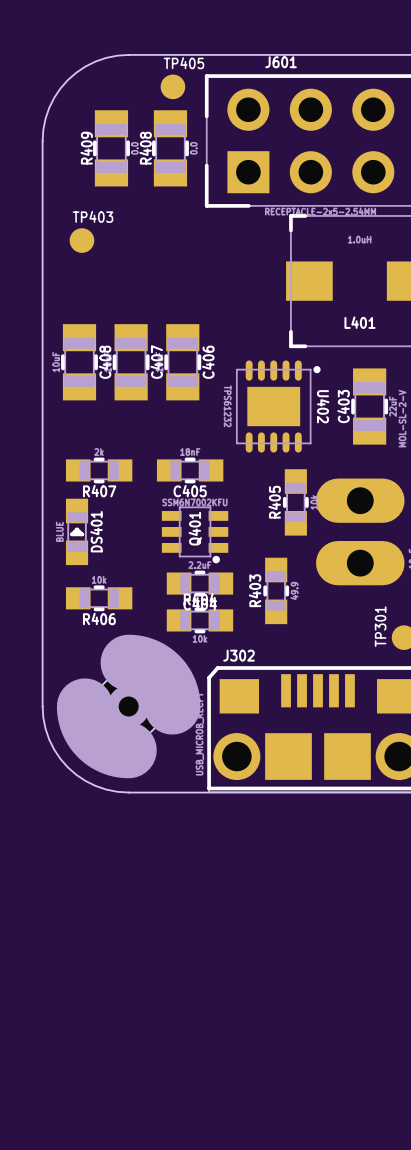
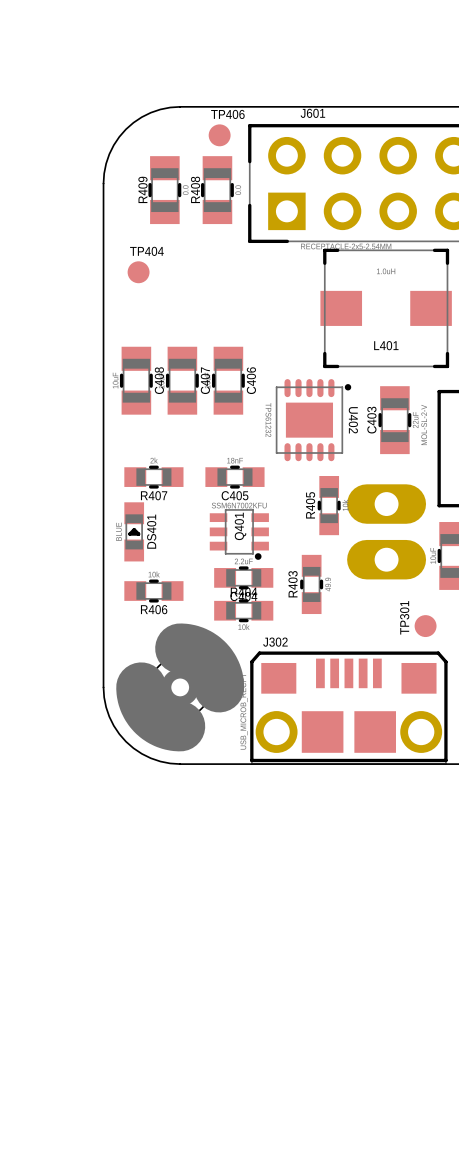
TP405 name: TP405 (183, 63) -> TP406 (227, 114)
TP403 name: TP403 (92, 216) -> TP404 (146, 251)

